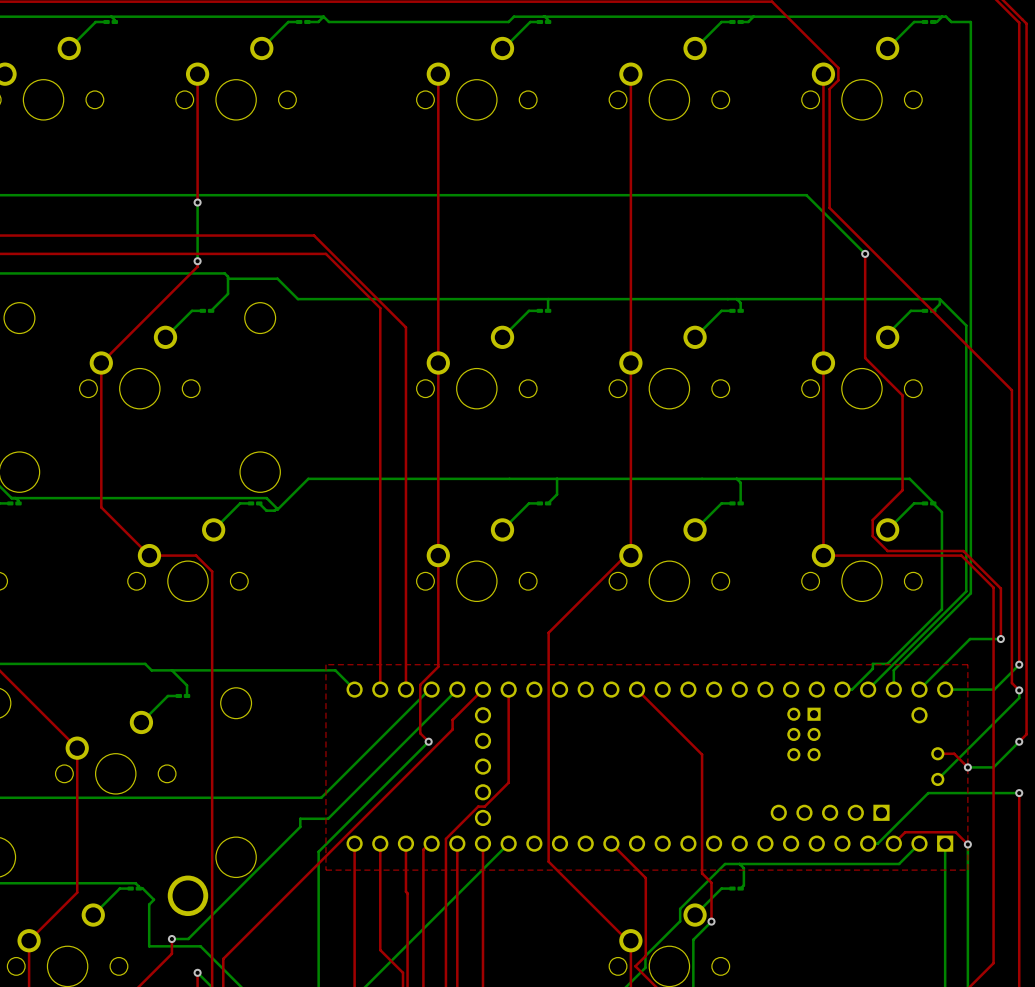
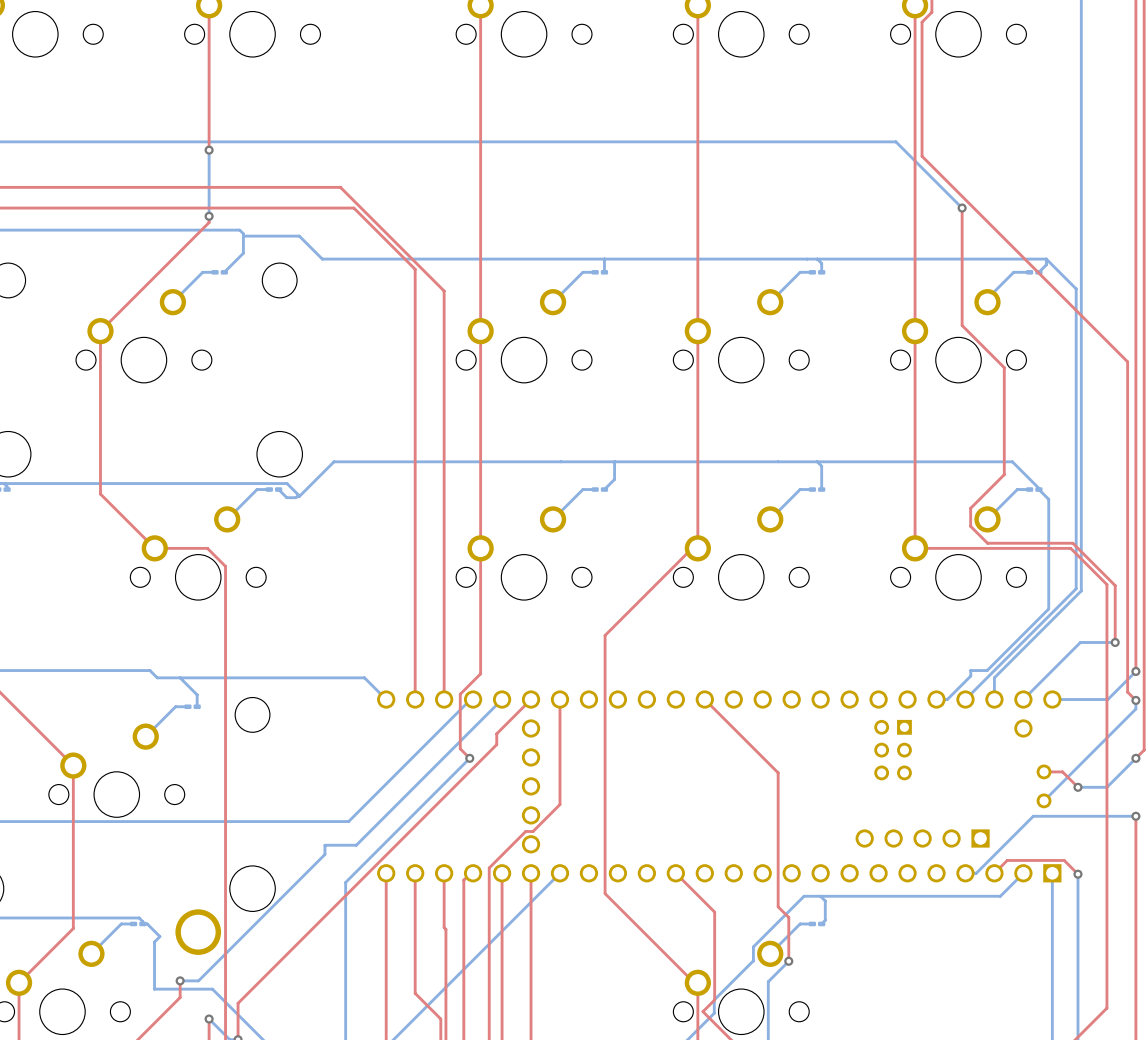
top zone outline: (325, 664) (967, 664) (967, 870) (325, 870) (325, 664) -> none

